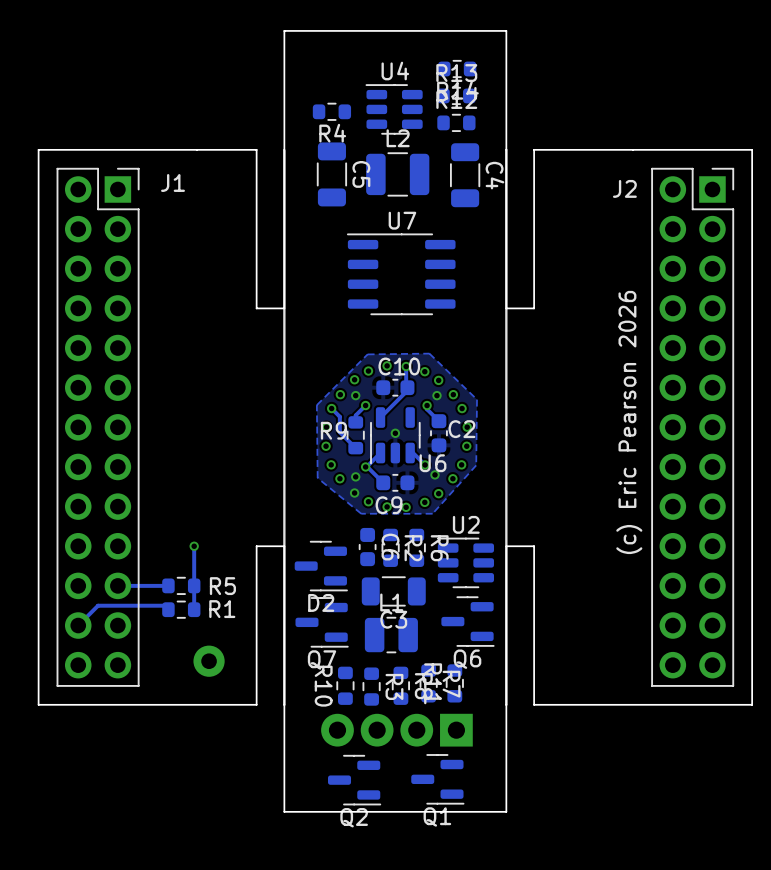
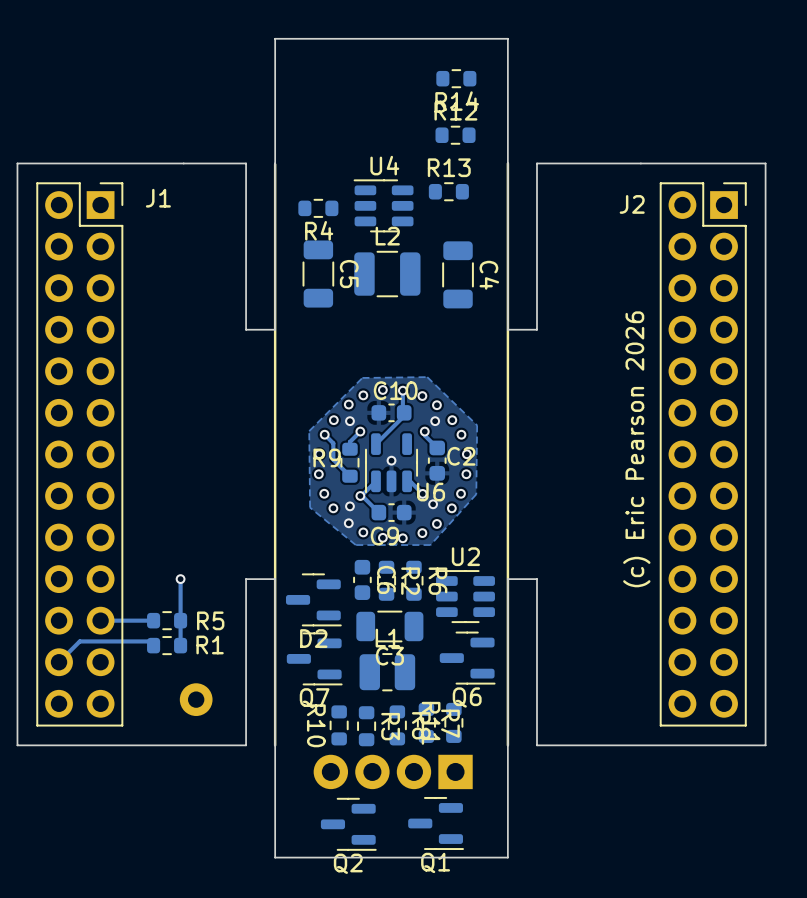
R13 position: (456, 95) -> (448, 191)
U4 position: (394, 109) -> (383, 205)
R4 position: (331, 111) -> (318, 208)
C5 position: (331, 174) -> (318, 274)
L2 position: (397, 174) -> (387, 274)
C4 position: (465, 175) -> (458, 274)
U7: (401, 274) -> none

